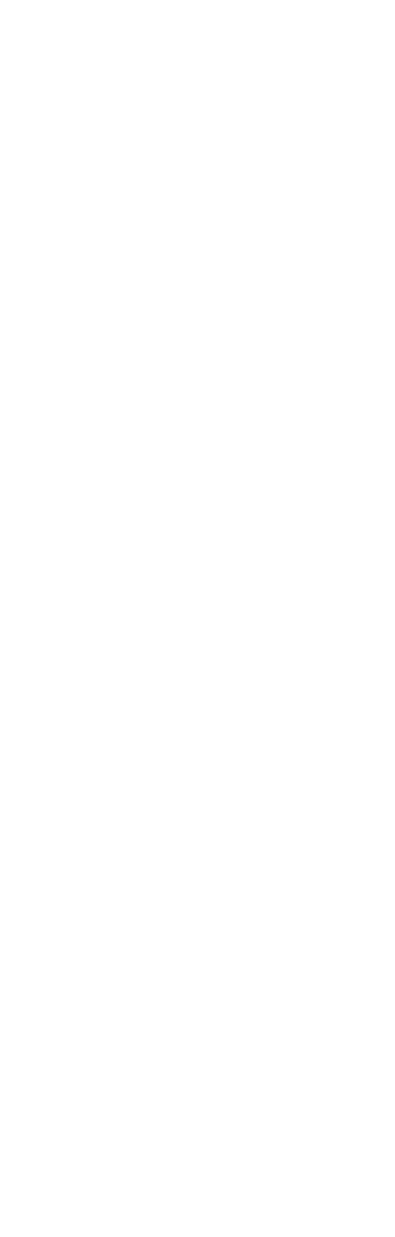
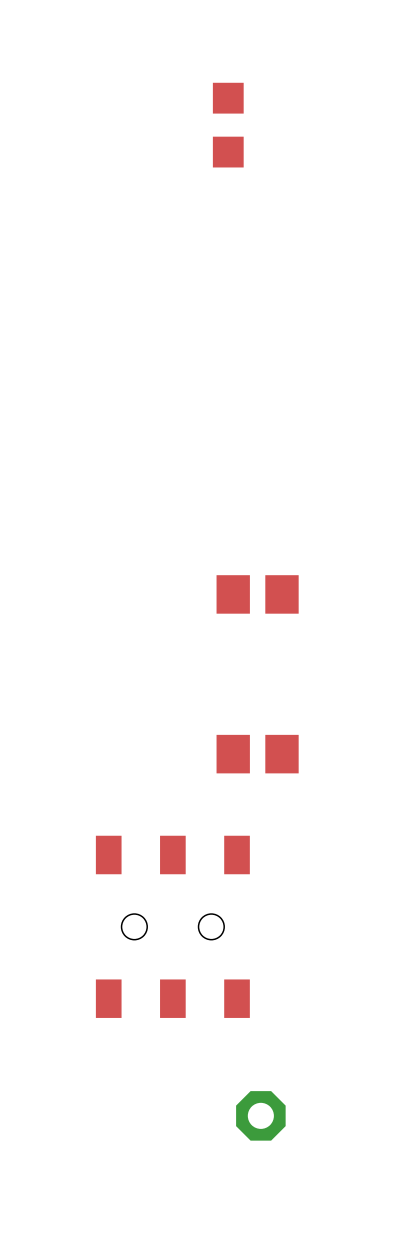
part: none -> (228, 125)
part: none -> (257, 594)
part: none -> (257, 754)
part: none -> (172, 926)
part: none -> (260, 1115)

